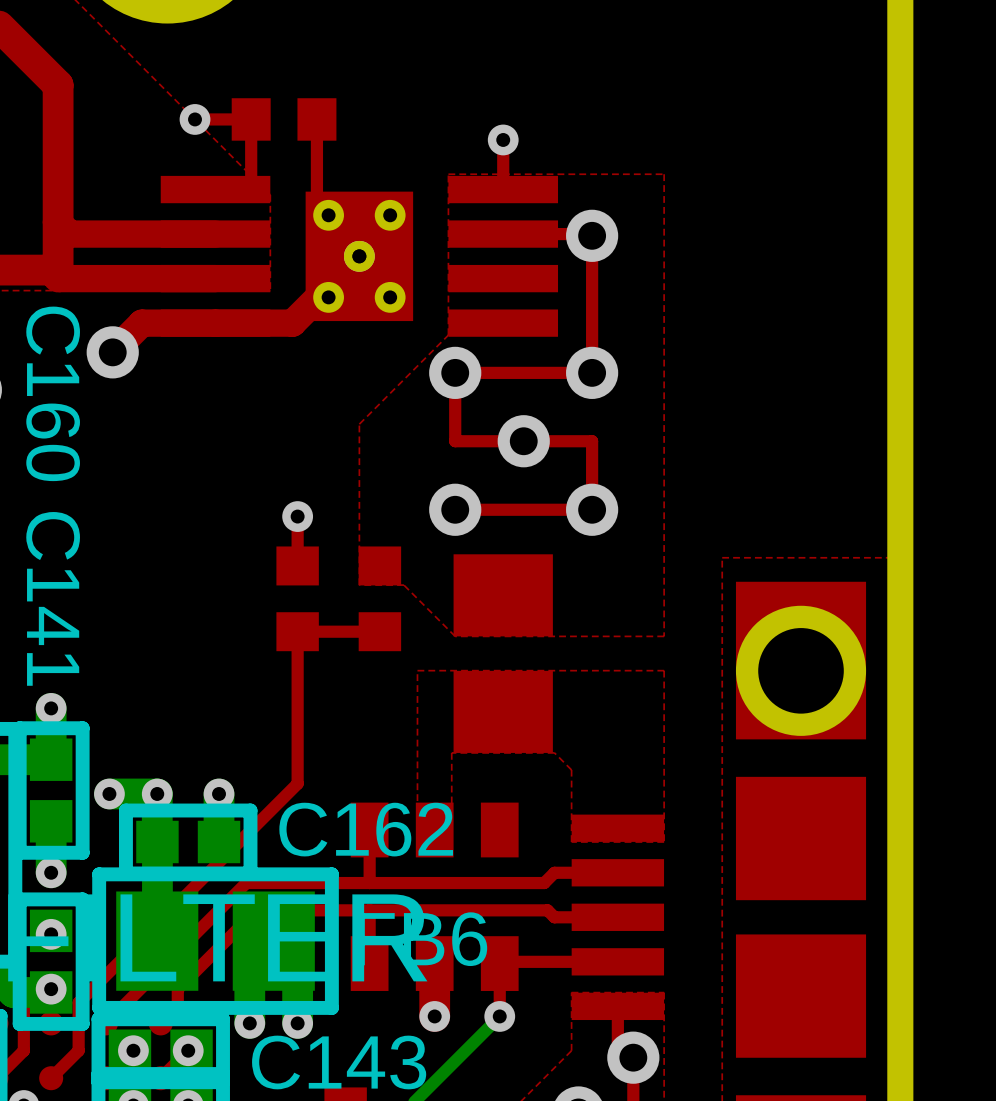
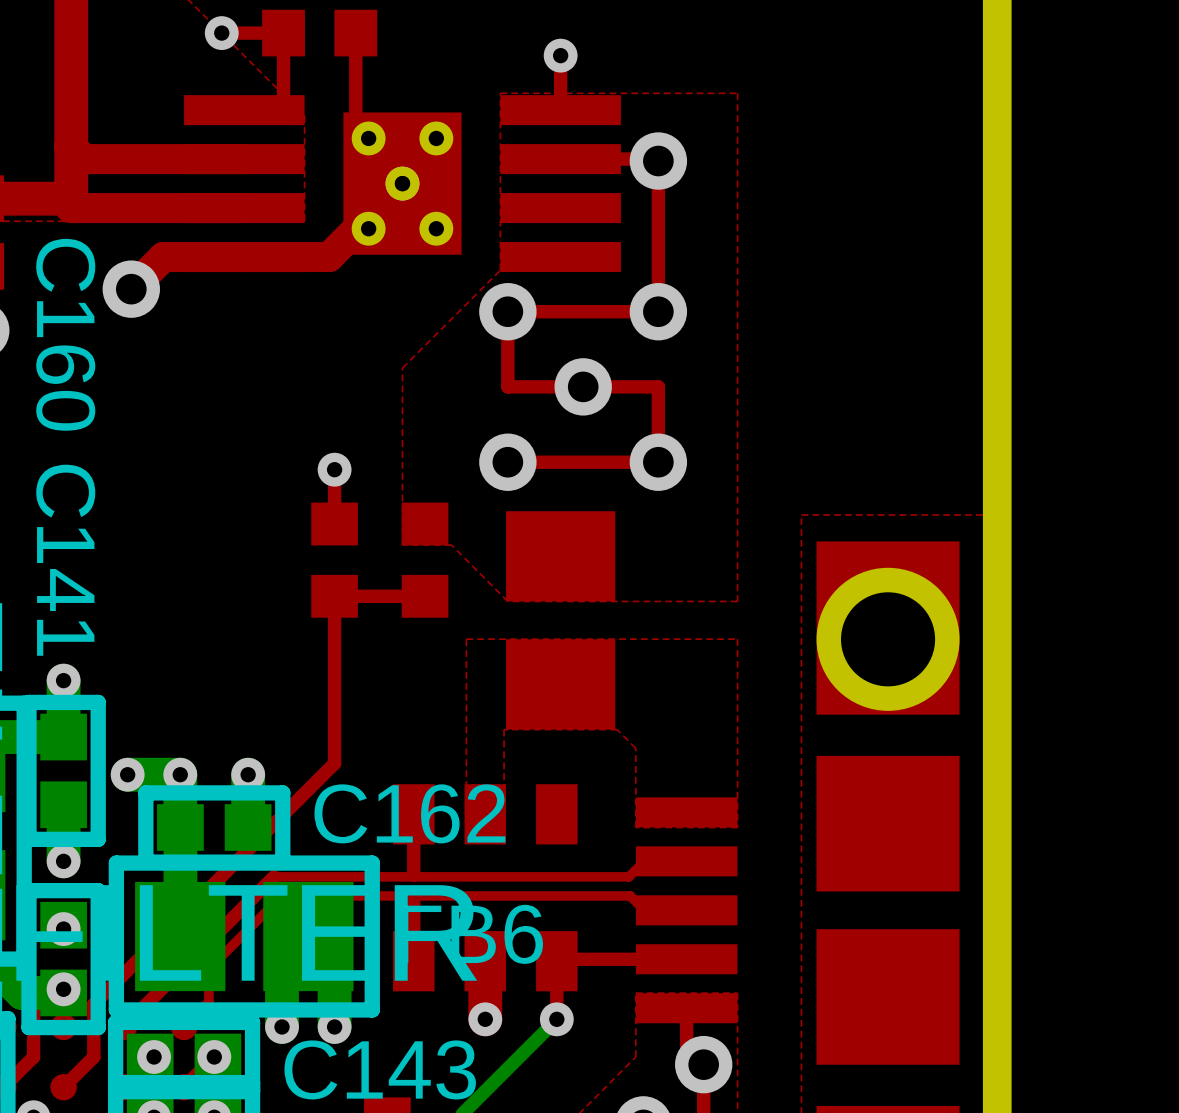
top track: (579, 872) (554, 872) (544, 883) (246, 883) (242, 886) -> (644, 861) (628, 876) (273, 876)
top track: (579, 917) (554, 917) (547, 910) (256, 910) (177, 989) (177, 1006) -> (644, 910) (630, 895) (281, 895) (208, 968) (208, 1002) (202, 1008)

